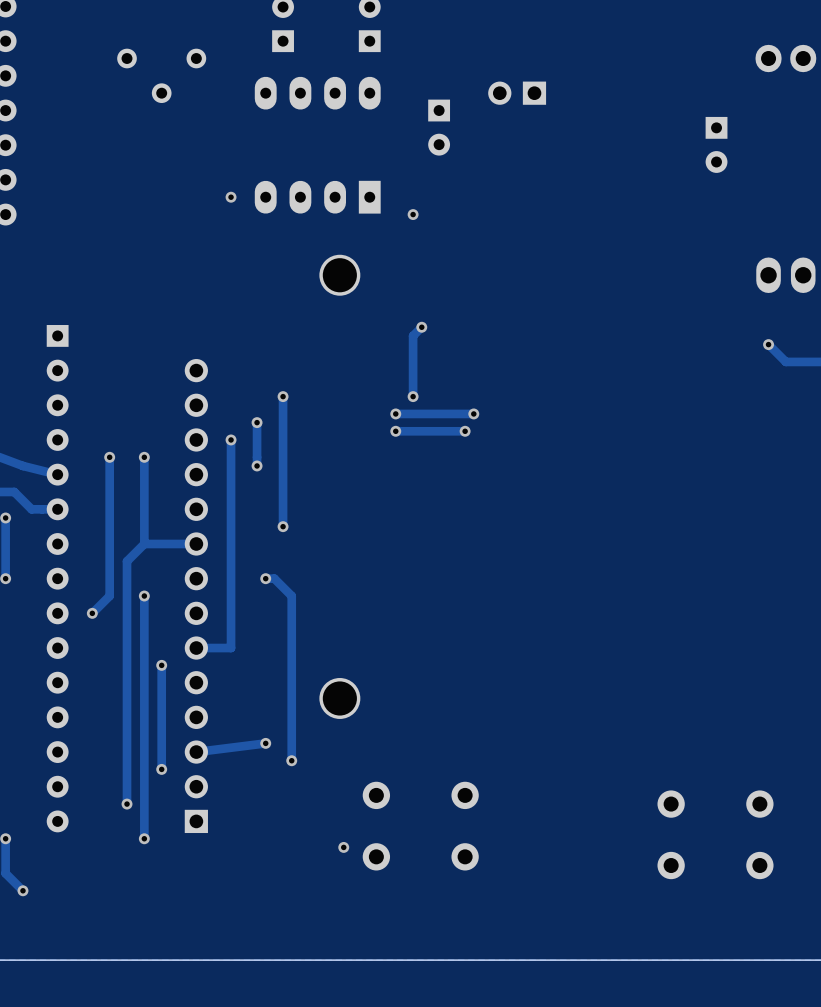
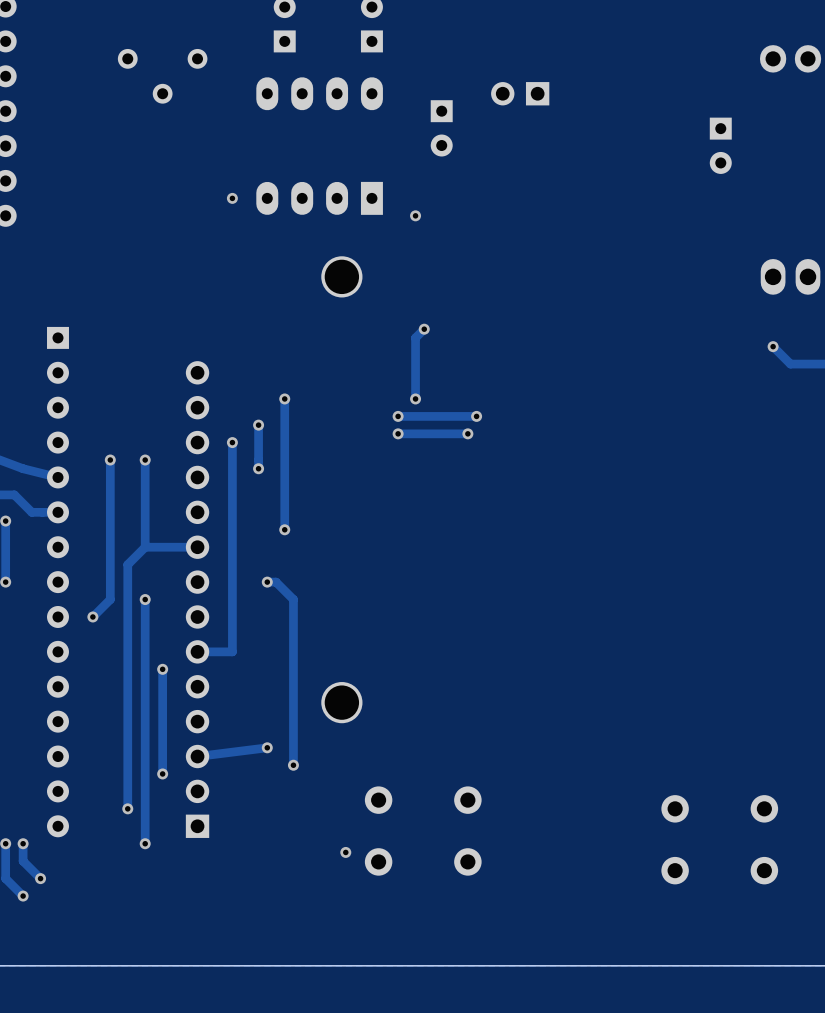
track: none -> (23, 843) (23, 861) (40, 878)
via: none -> (23, 843)
via: none -> (40, 878)

